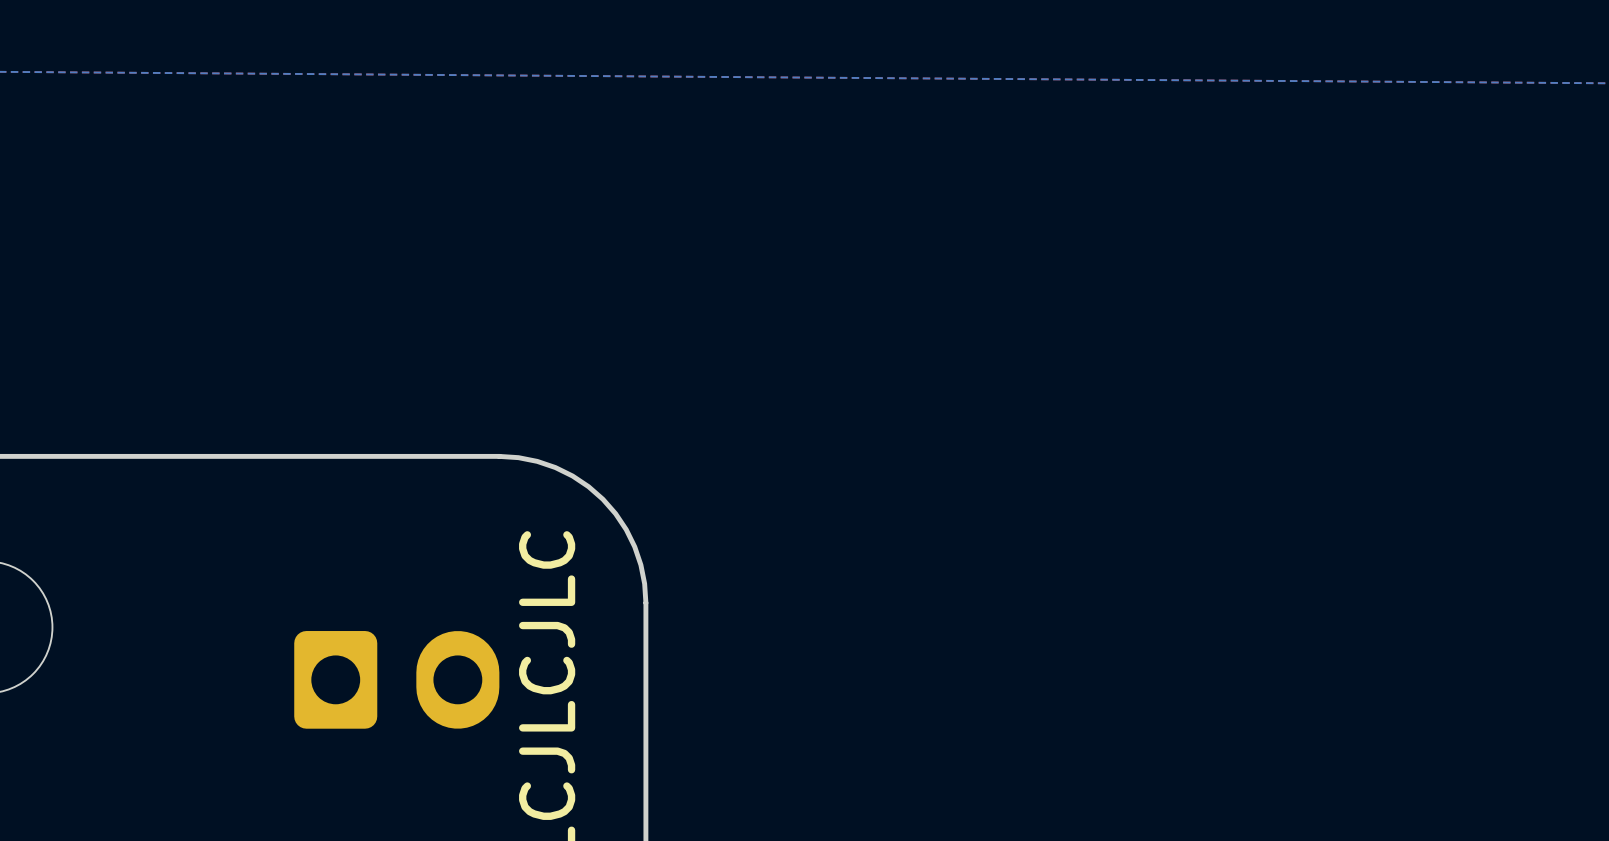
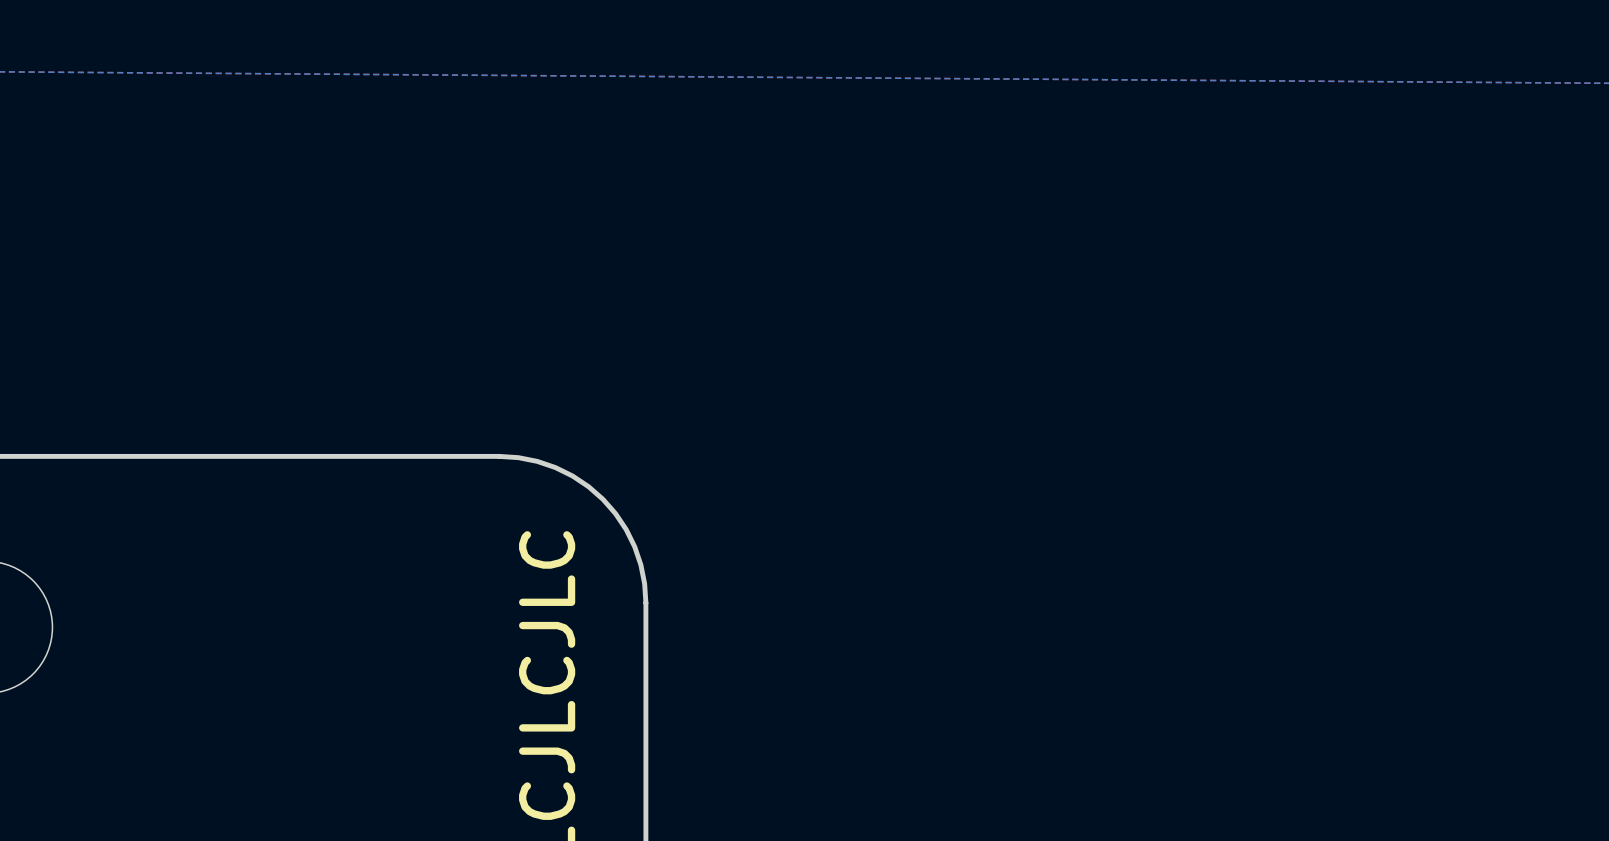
part: (396, 679) -> none

